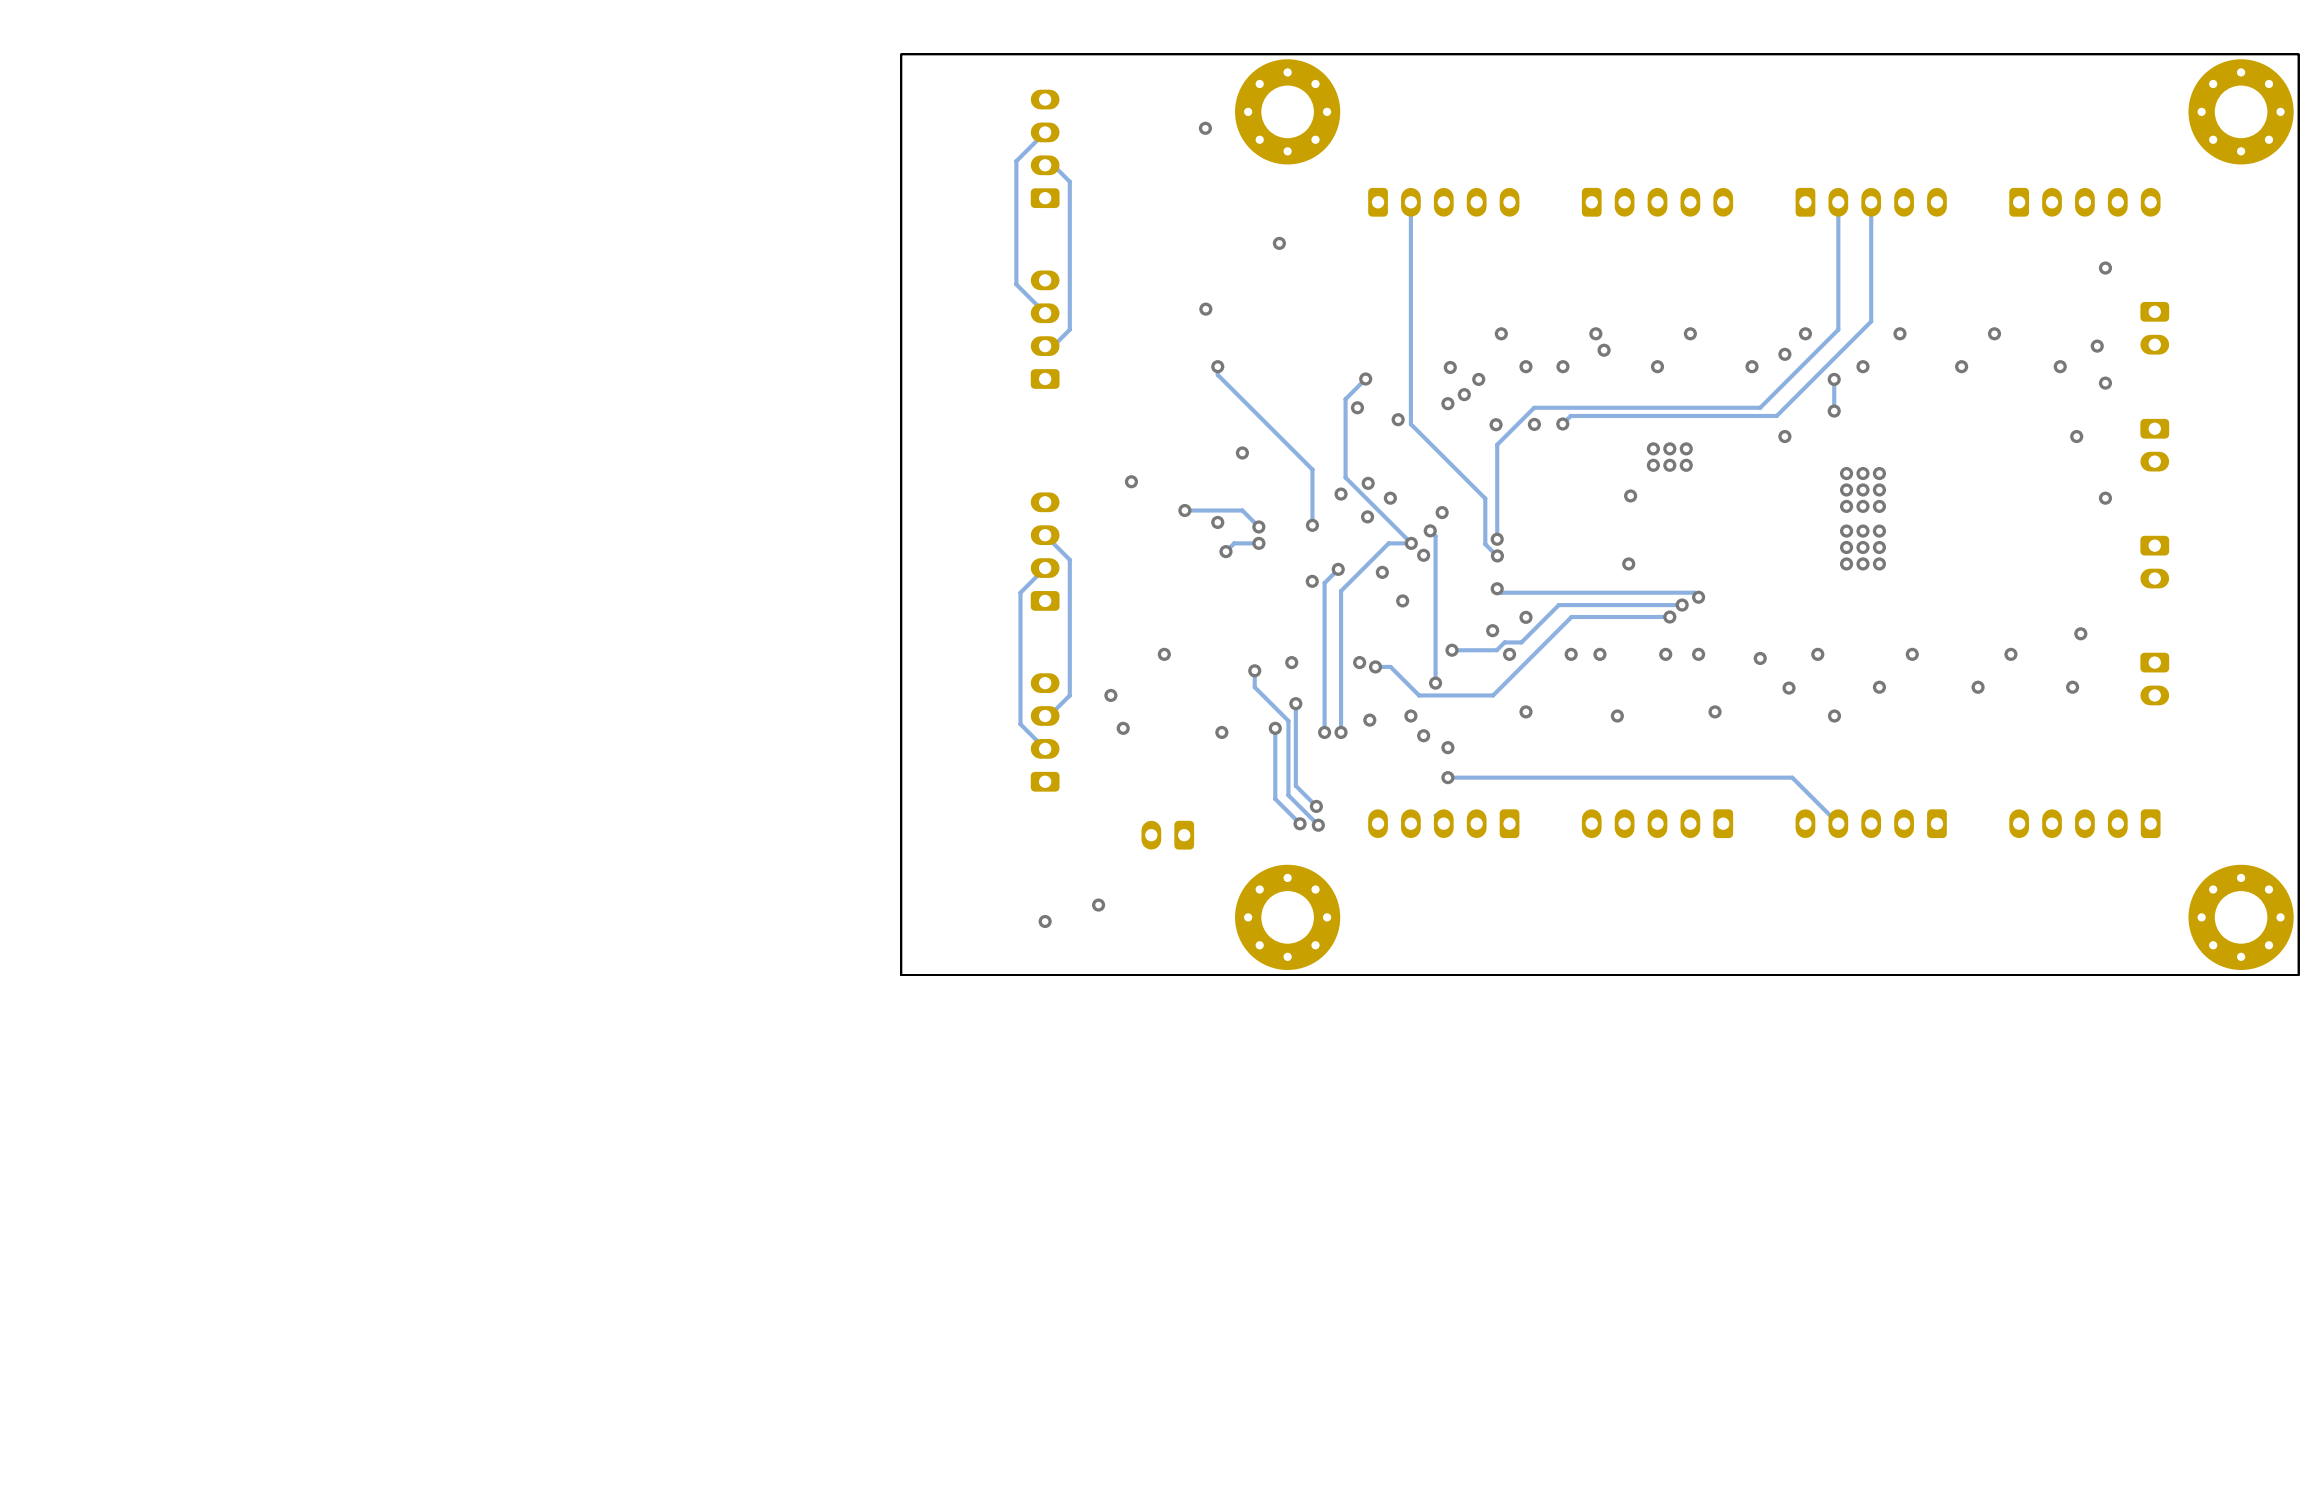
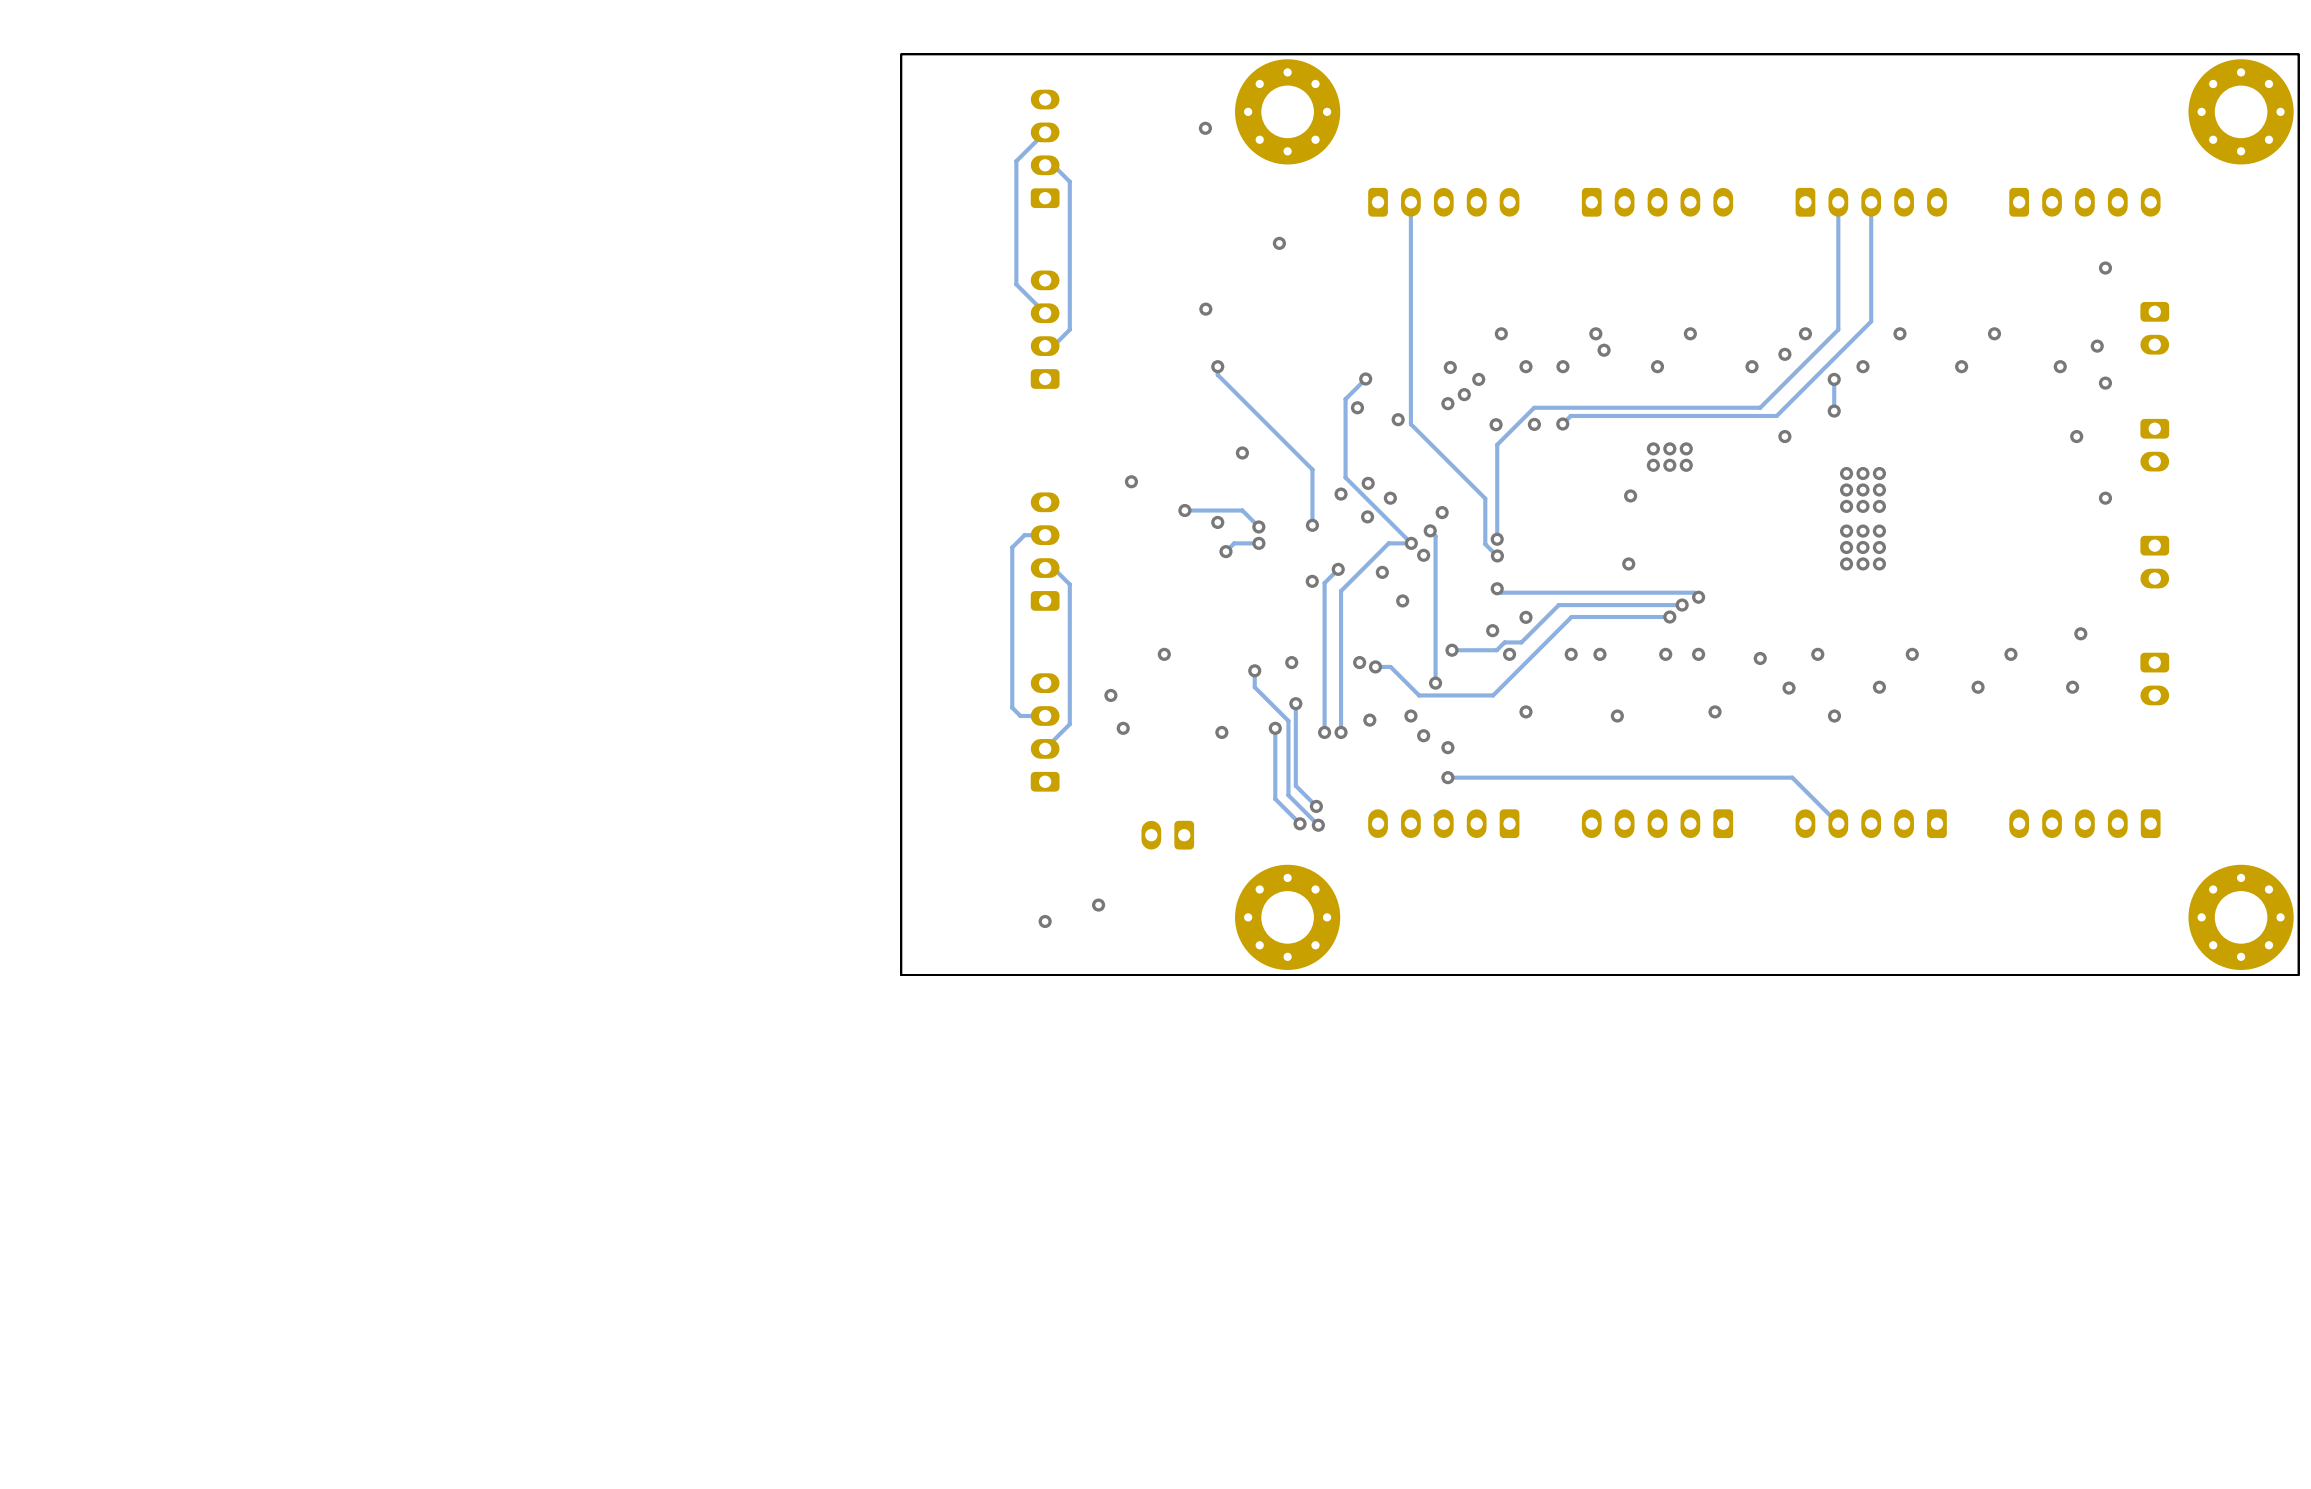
track: (1045, 535) (1069, 559) (1069, 584) -> (1053, 568) (1069, 584)
track: none -> (1045, 535) (1024, 535) (1012, 547) (1012, 707) (1020, 716) (1045, 716)
track: (1045, 568) (1020, 592) (1020, 724) (1045, 748) -> none
track: (1069, 695) (1049, 716) (1045, 716) -> (1069, 695) (1069, 724) (1045, 748)

